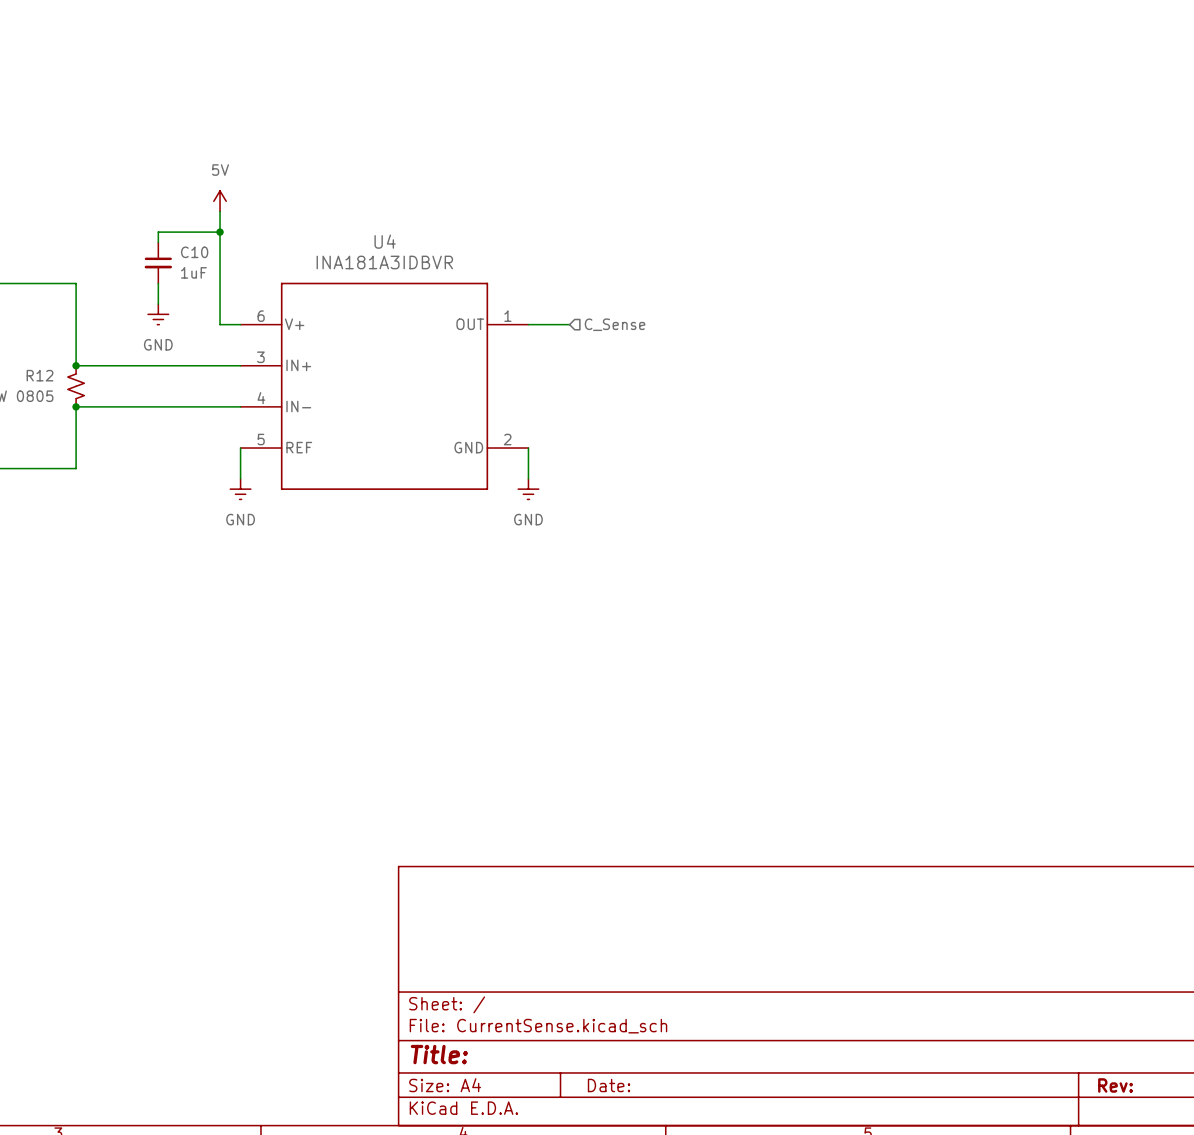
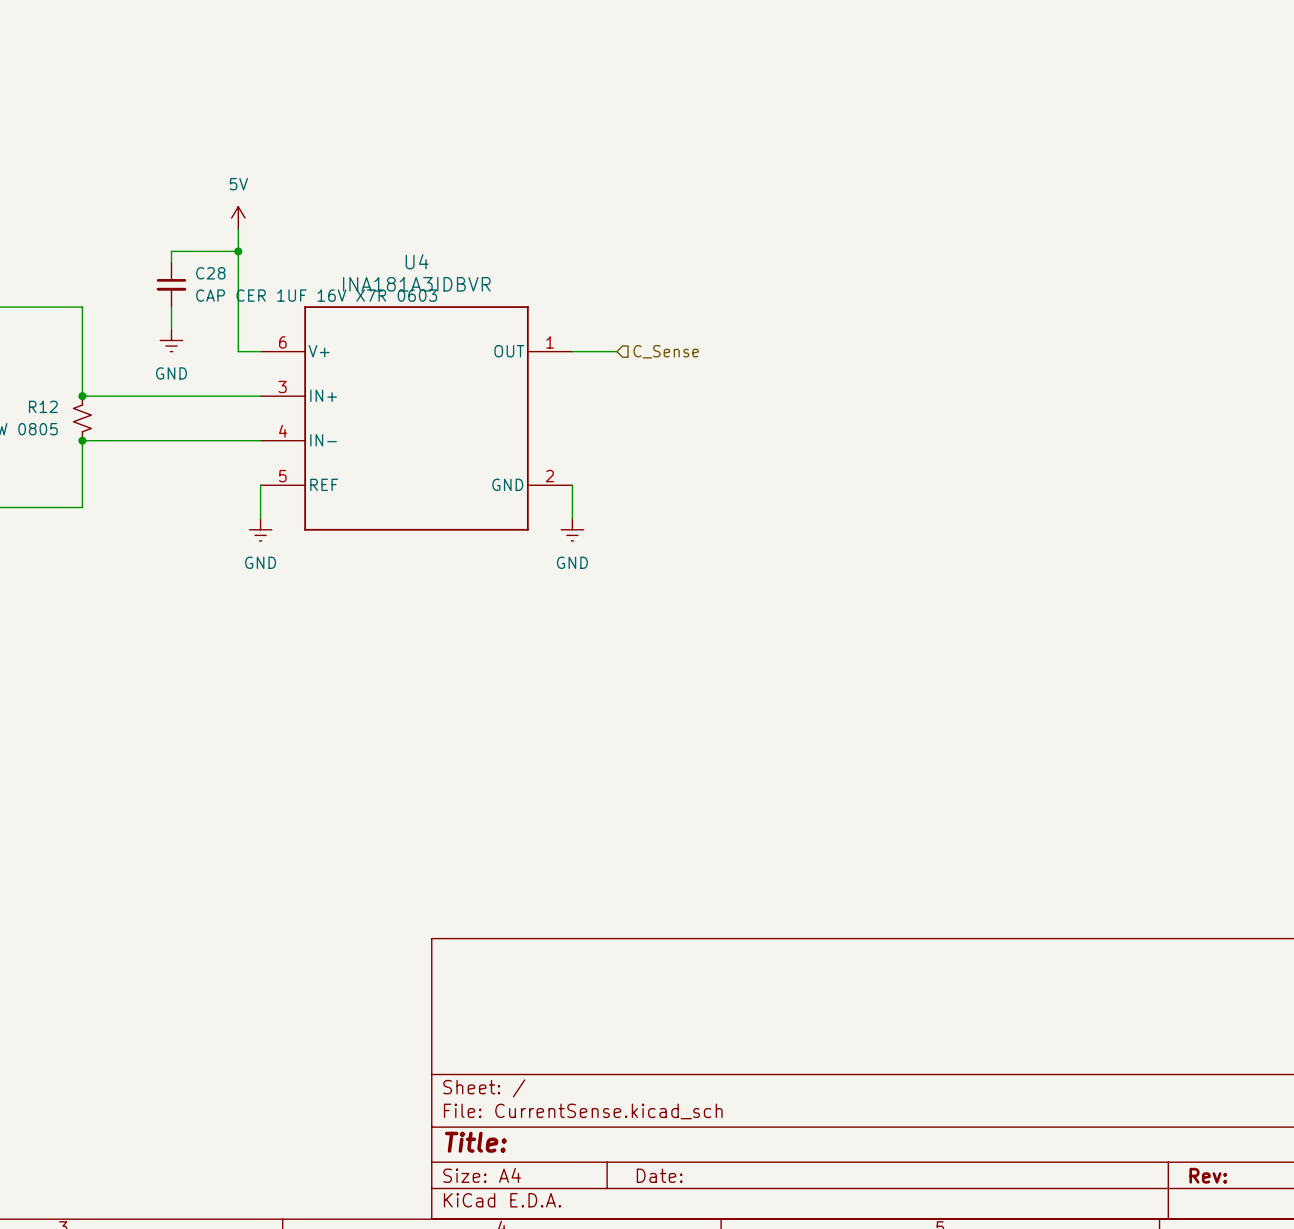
C10 name: C10 (194, 252) -> C28 (210, 273)
C10 value: 1uF (193, 272) -> CAP CER 1UF 16V X7R 0603 (316, 295)

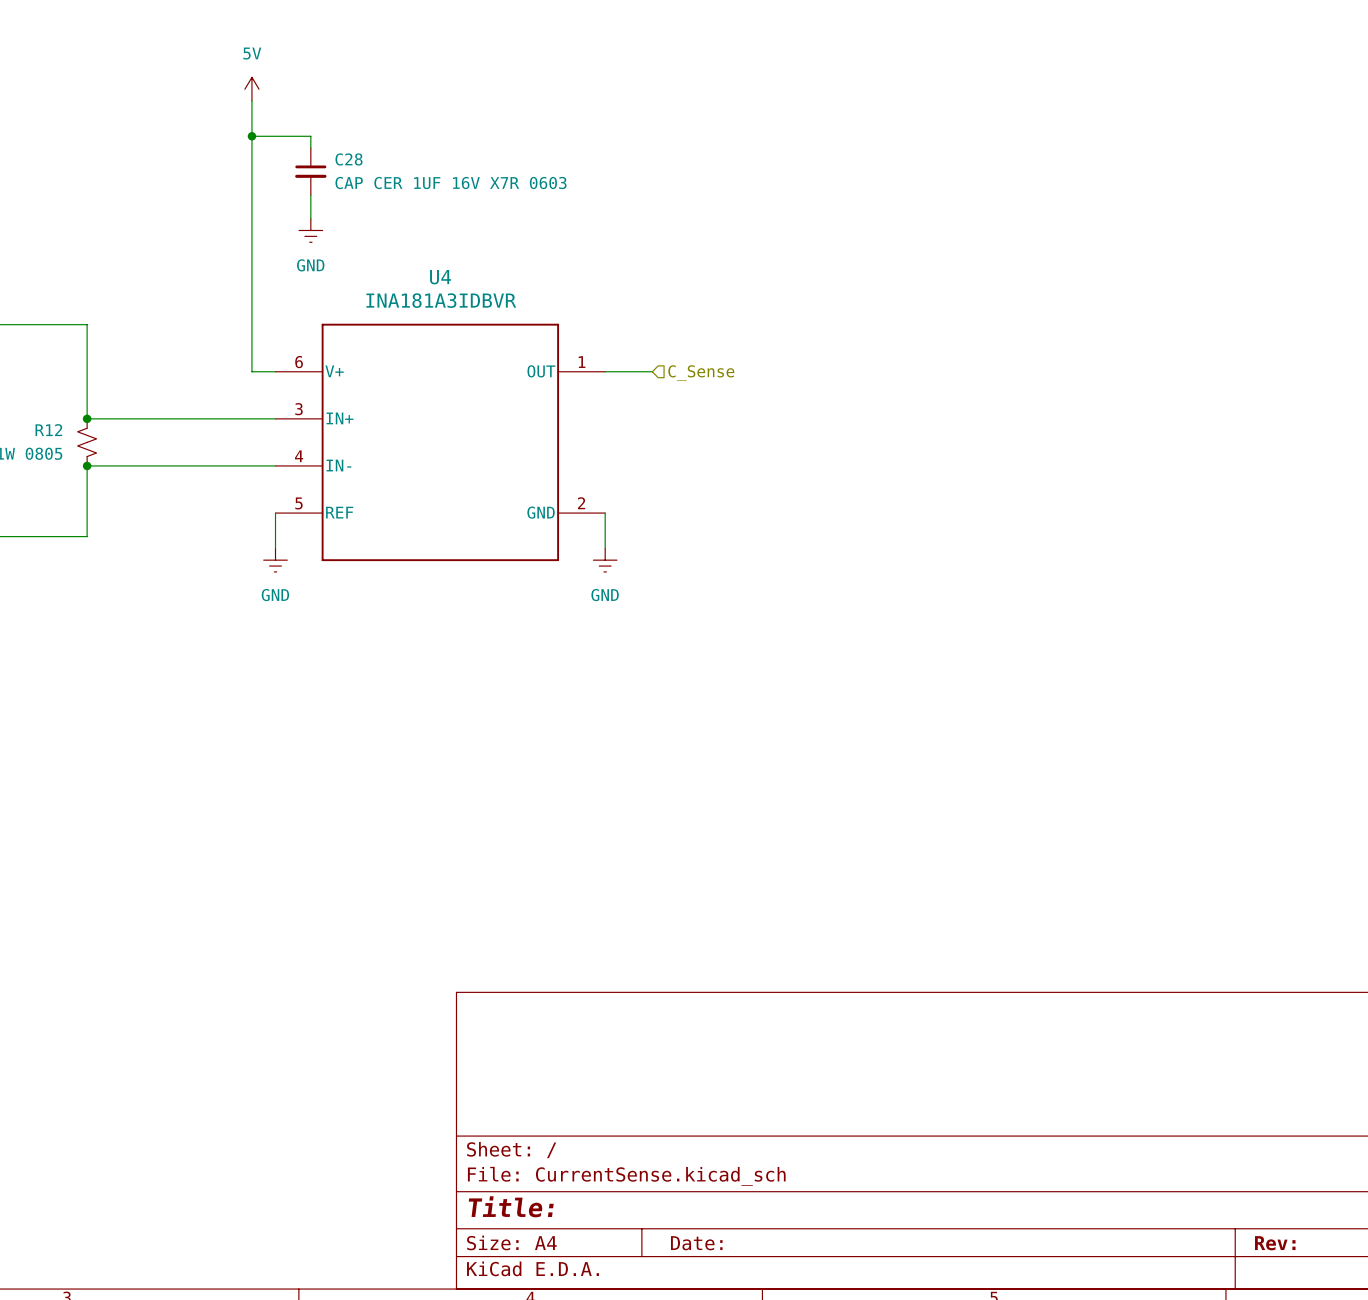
wire: none -> (251, 100) (251, 242)
wire: none -> (251, 136) (310, 136) (310, 148)
junction: none -> (251, 136)
power symbol position: 5V (238, 217) -> 5V (251, 89)
wire: (238, 251) (171, 251) (171, 262) -> none
junction: (238, 251) -> none
C28 position: (171, 284) -> (310, 171)
wire: (171, 307) (171, 329) -> (310, 195) (310, 218)
power symbol position: GND (171, 340) -> GND (310, 230)

